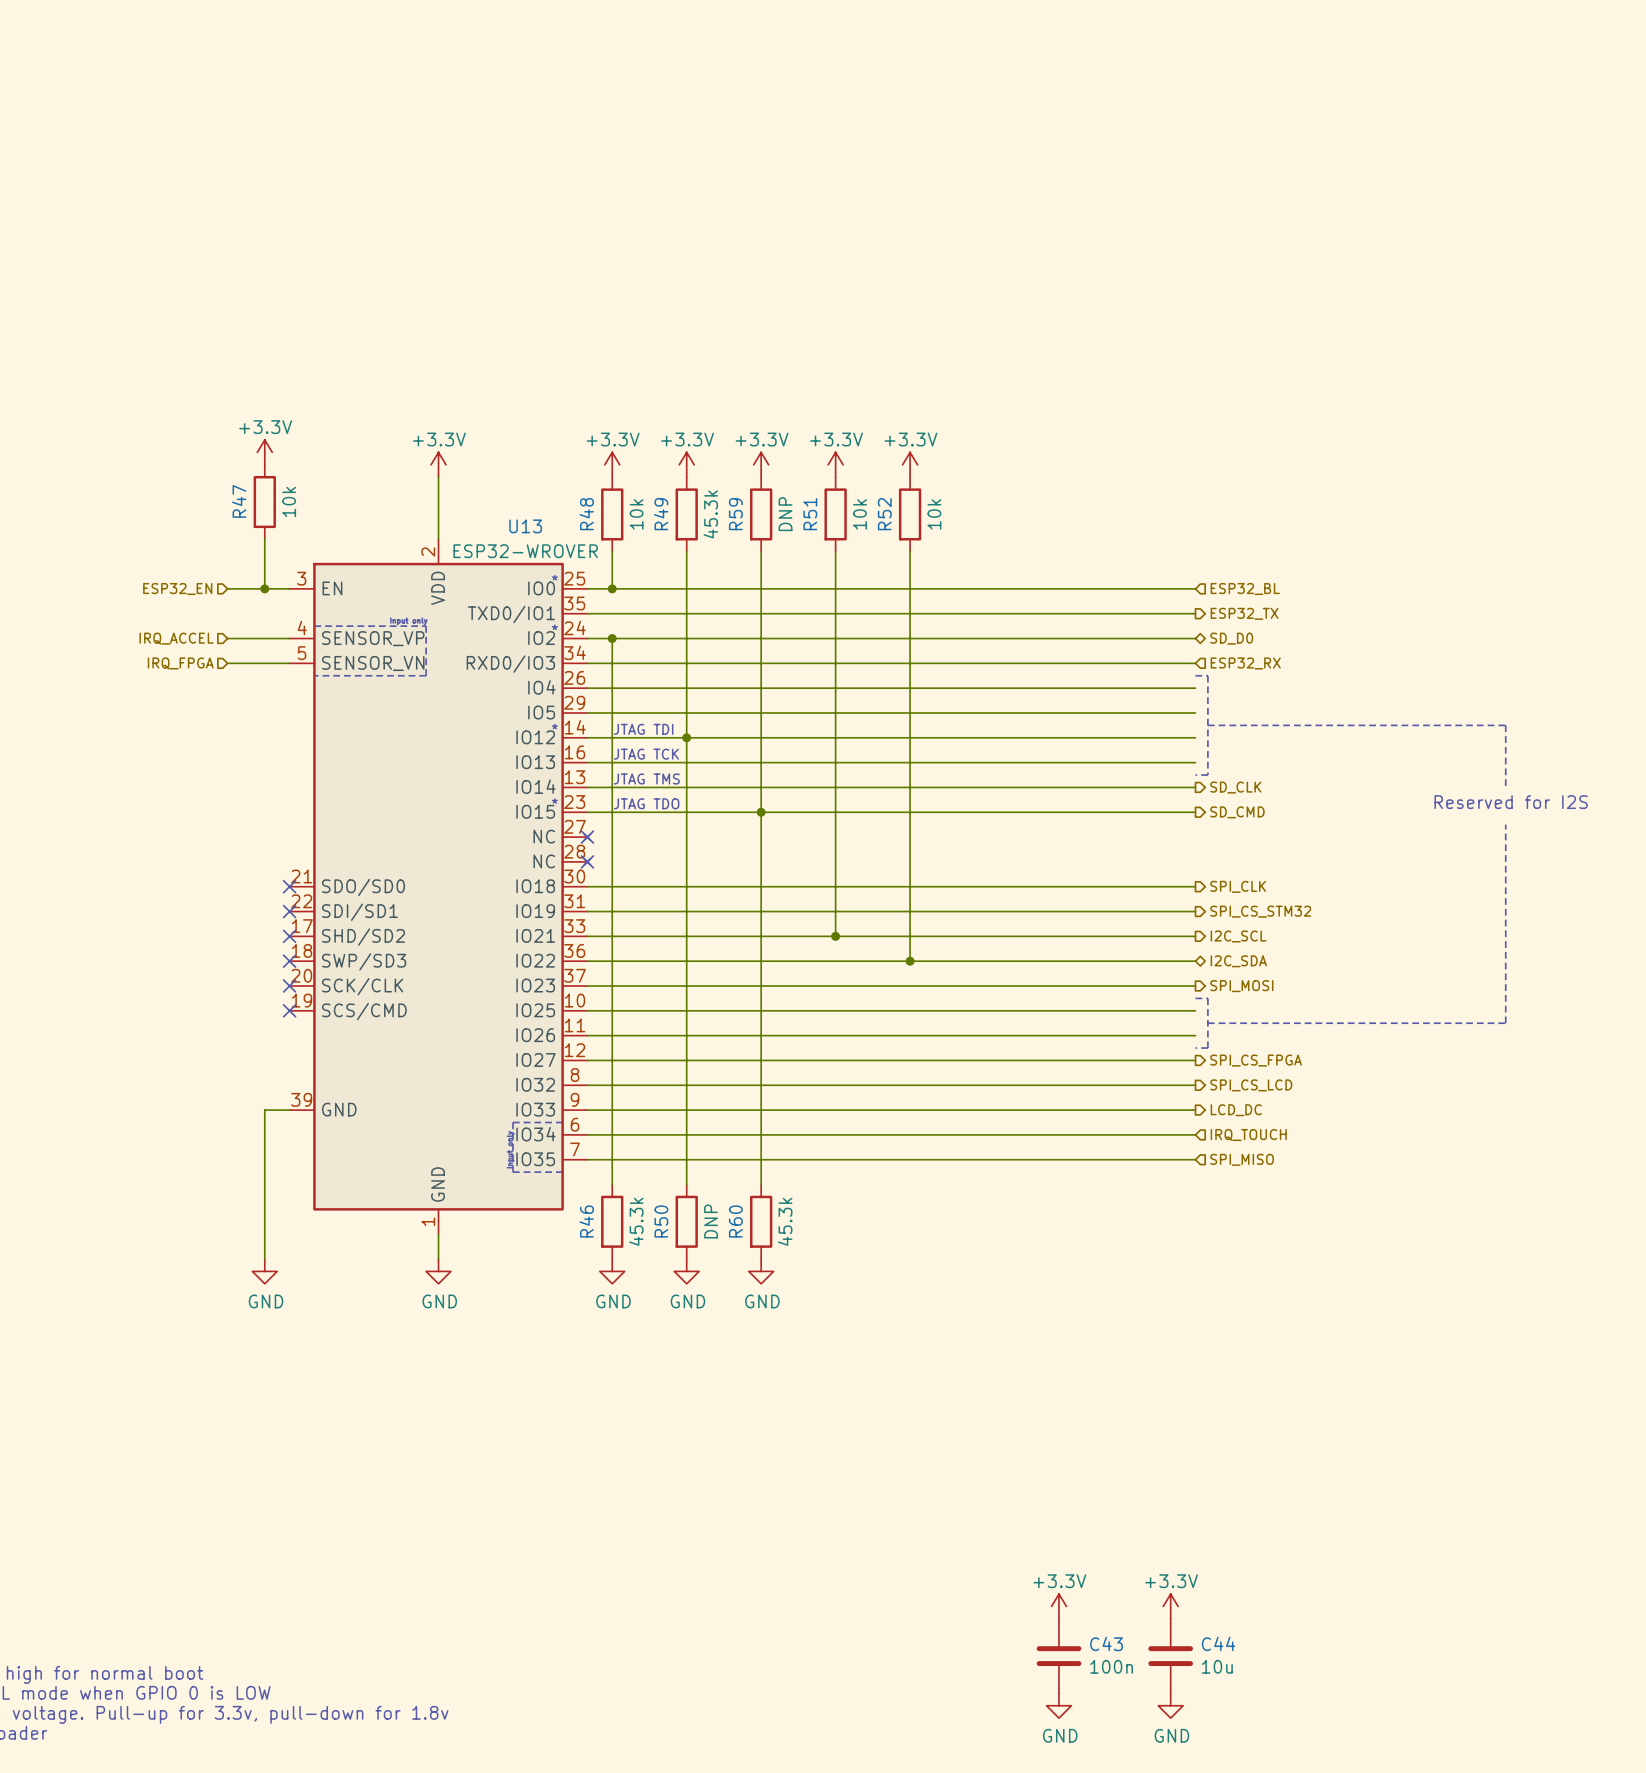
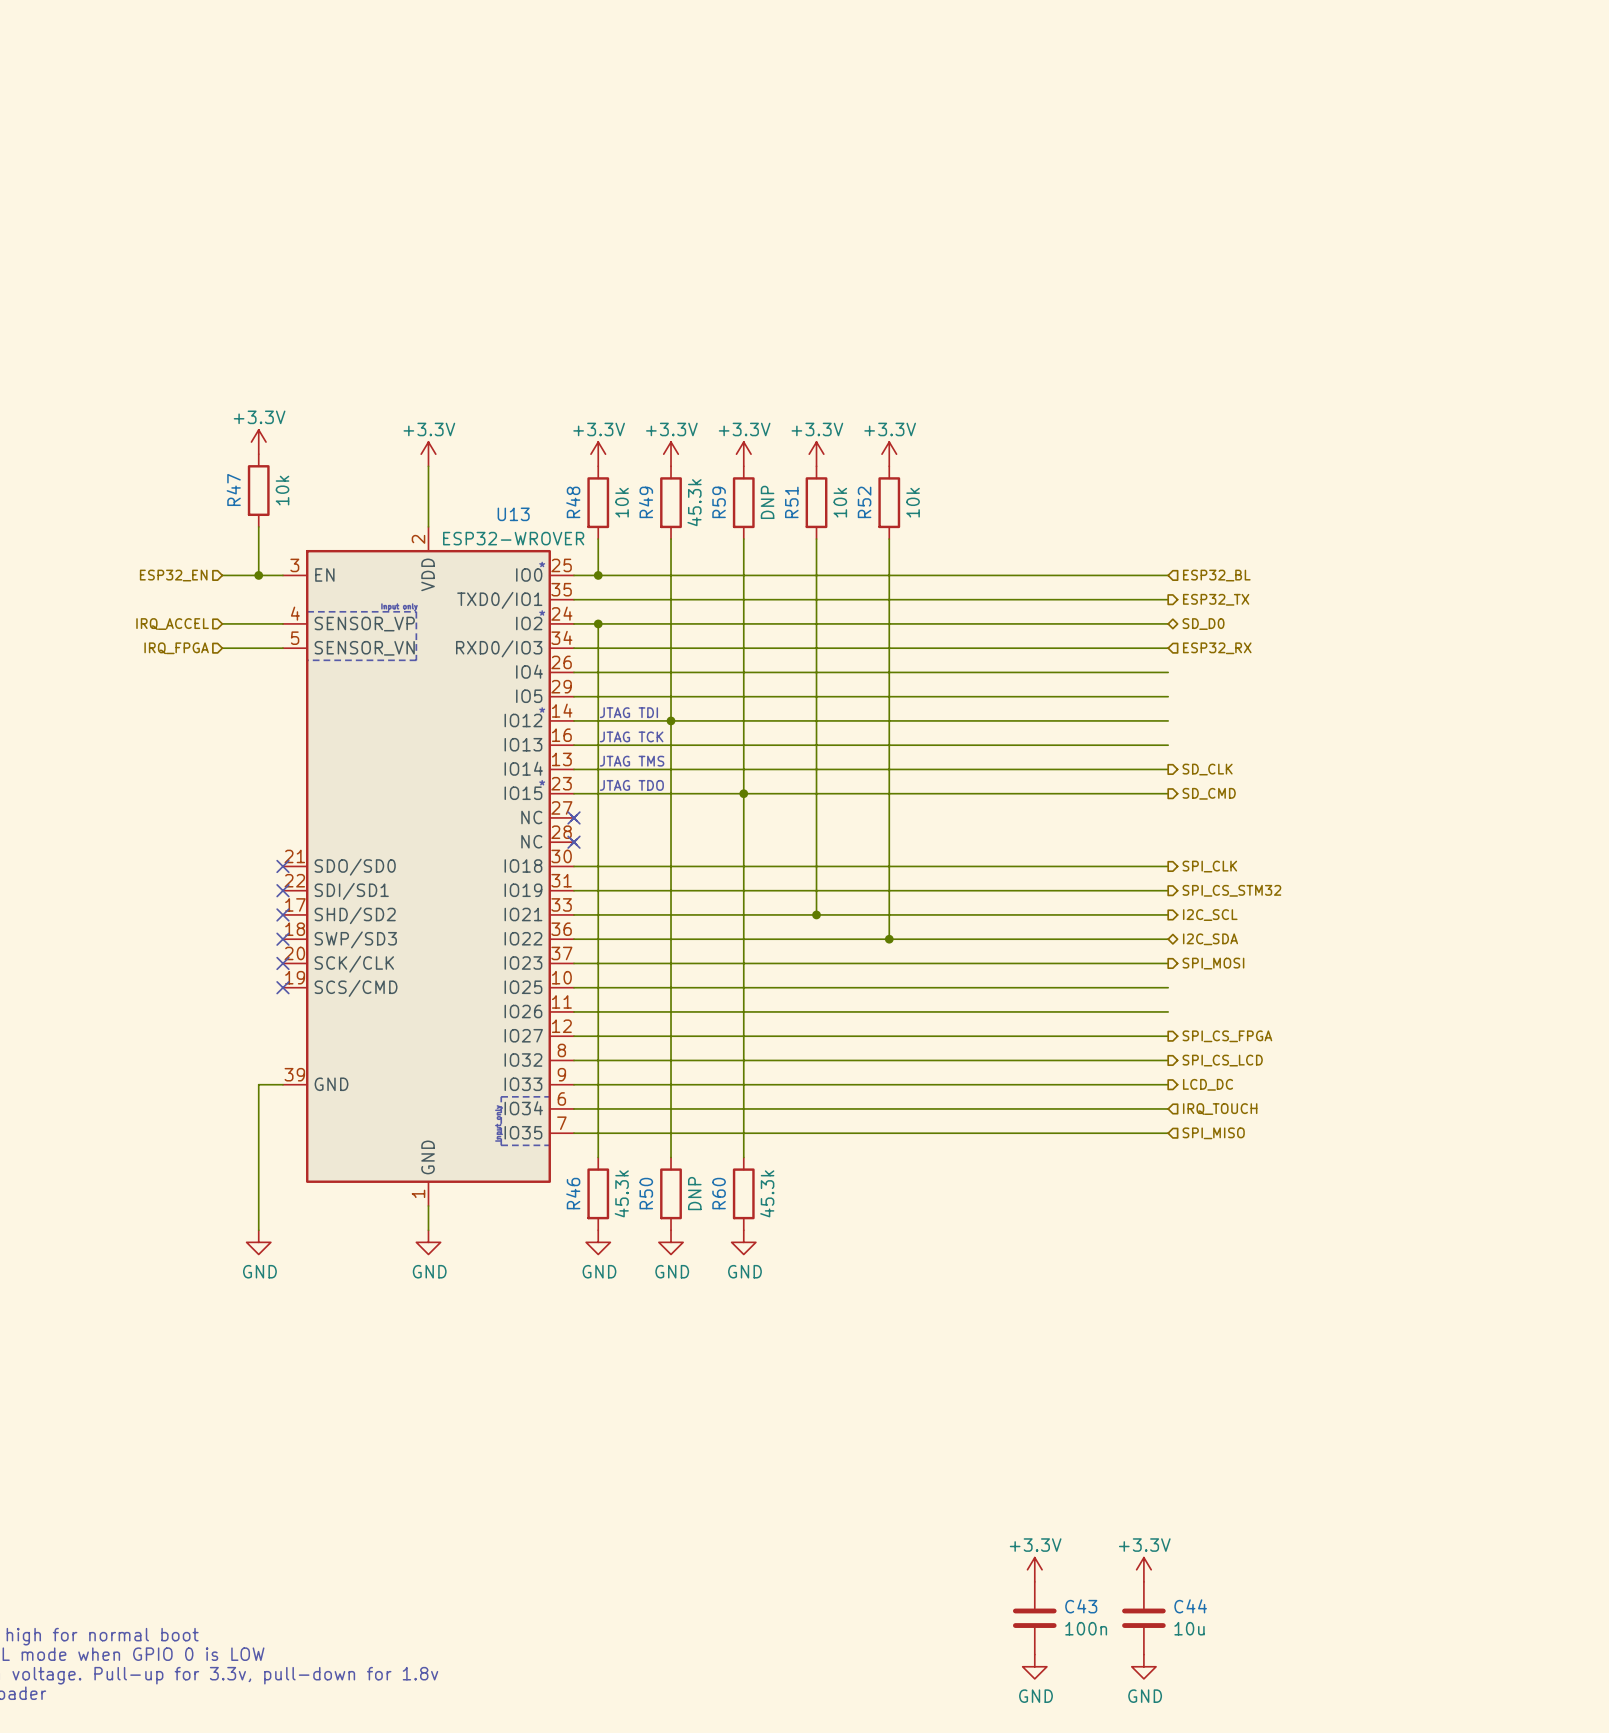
line: (1195, 675) (1207, 675) (1207, 775) (1195, 775) -> none
line: (1207, 725) (1505, 725) (1505, 787) -> none
text: Reserved for I2S (1511, 802) -> none
line: (1505, 824) (1505, 1023) (1207, 1023) -> none
line: (1195, 998) (1207, 998) (1207, 1048) (1195, 1048) -> none

